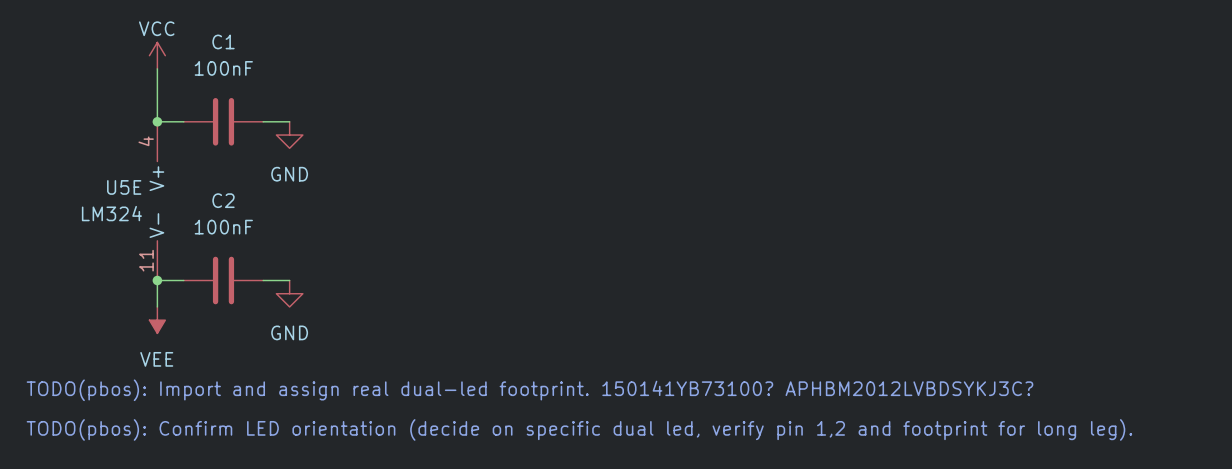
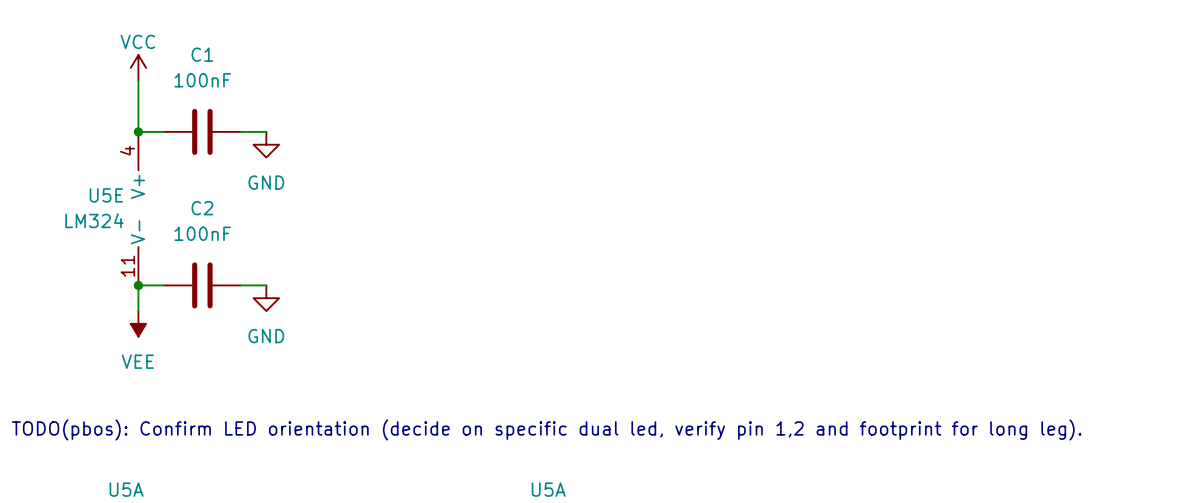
text: TODO(pbos): Import and assign real dual-led footprint. 150141YB73100? APHBM2012LVBDSYKJ3C? (529, 390) -> none

